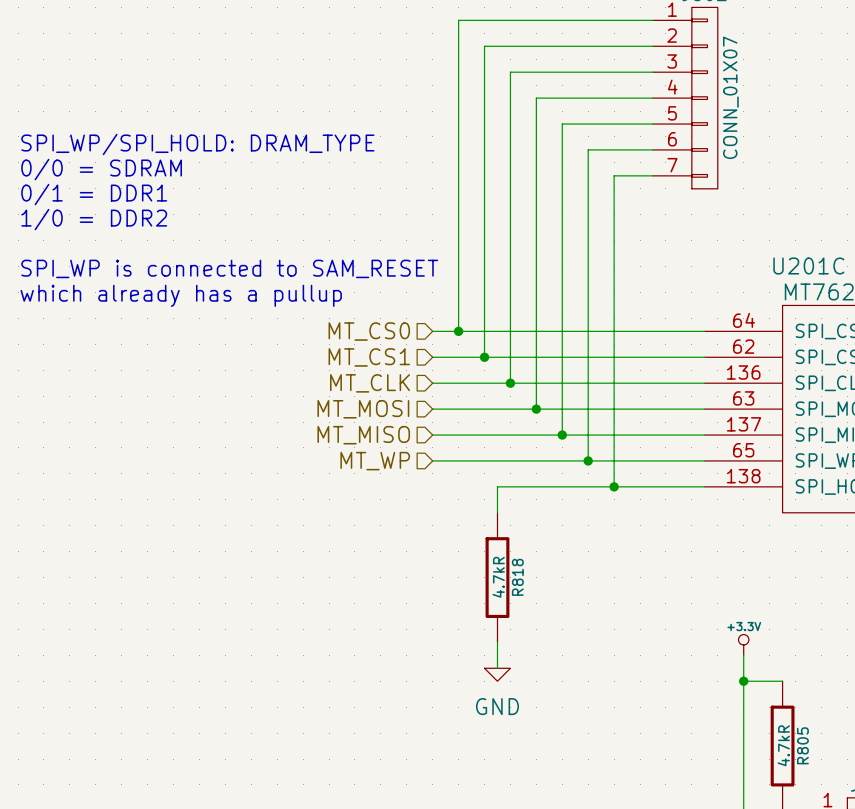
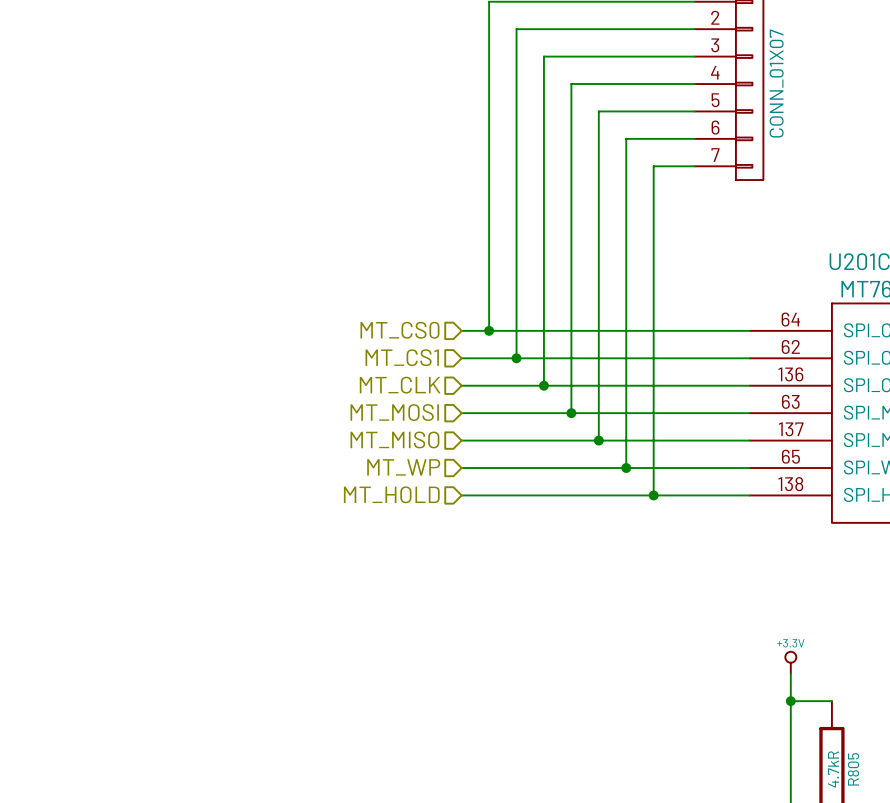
text: SPI_WP/SPI_HOLD: DRAM_TYPE (197, 144) -> none
text: 0/0 = SDRAM (101, 169) -> none
text: 0/1 = DDR1 (94, 194) -> none
text: 1/0 = DDR2 (94, 219) -> none
text: SPI_WP is connected to SAM_RESET (229, 268) -> none
text: which already has a pullup (181, 295) -> none
wire: (497, 486) (497, 512) -> (530, 495) (461, 495)
hierarchical label: none -> MT_HOLD (391, 494)
R818: 4.7kR (497, 577) -> none
wire: (497, 642) (497, 668) -> none
power symbol: GND (497, 674) -> none

